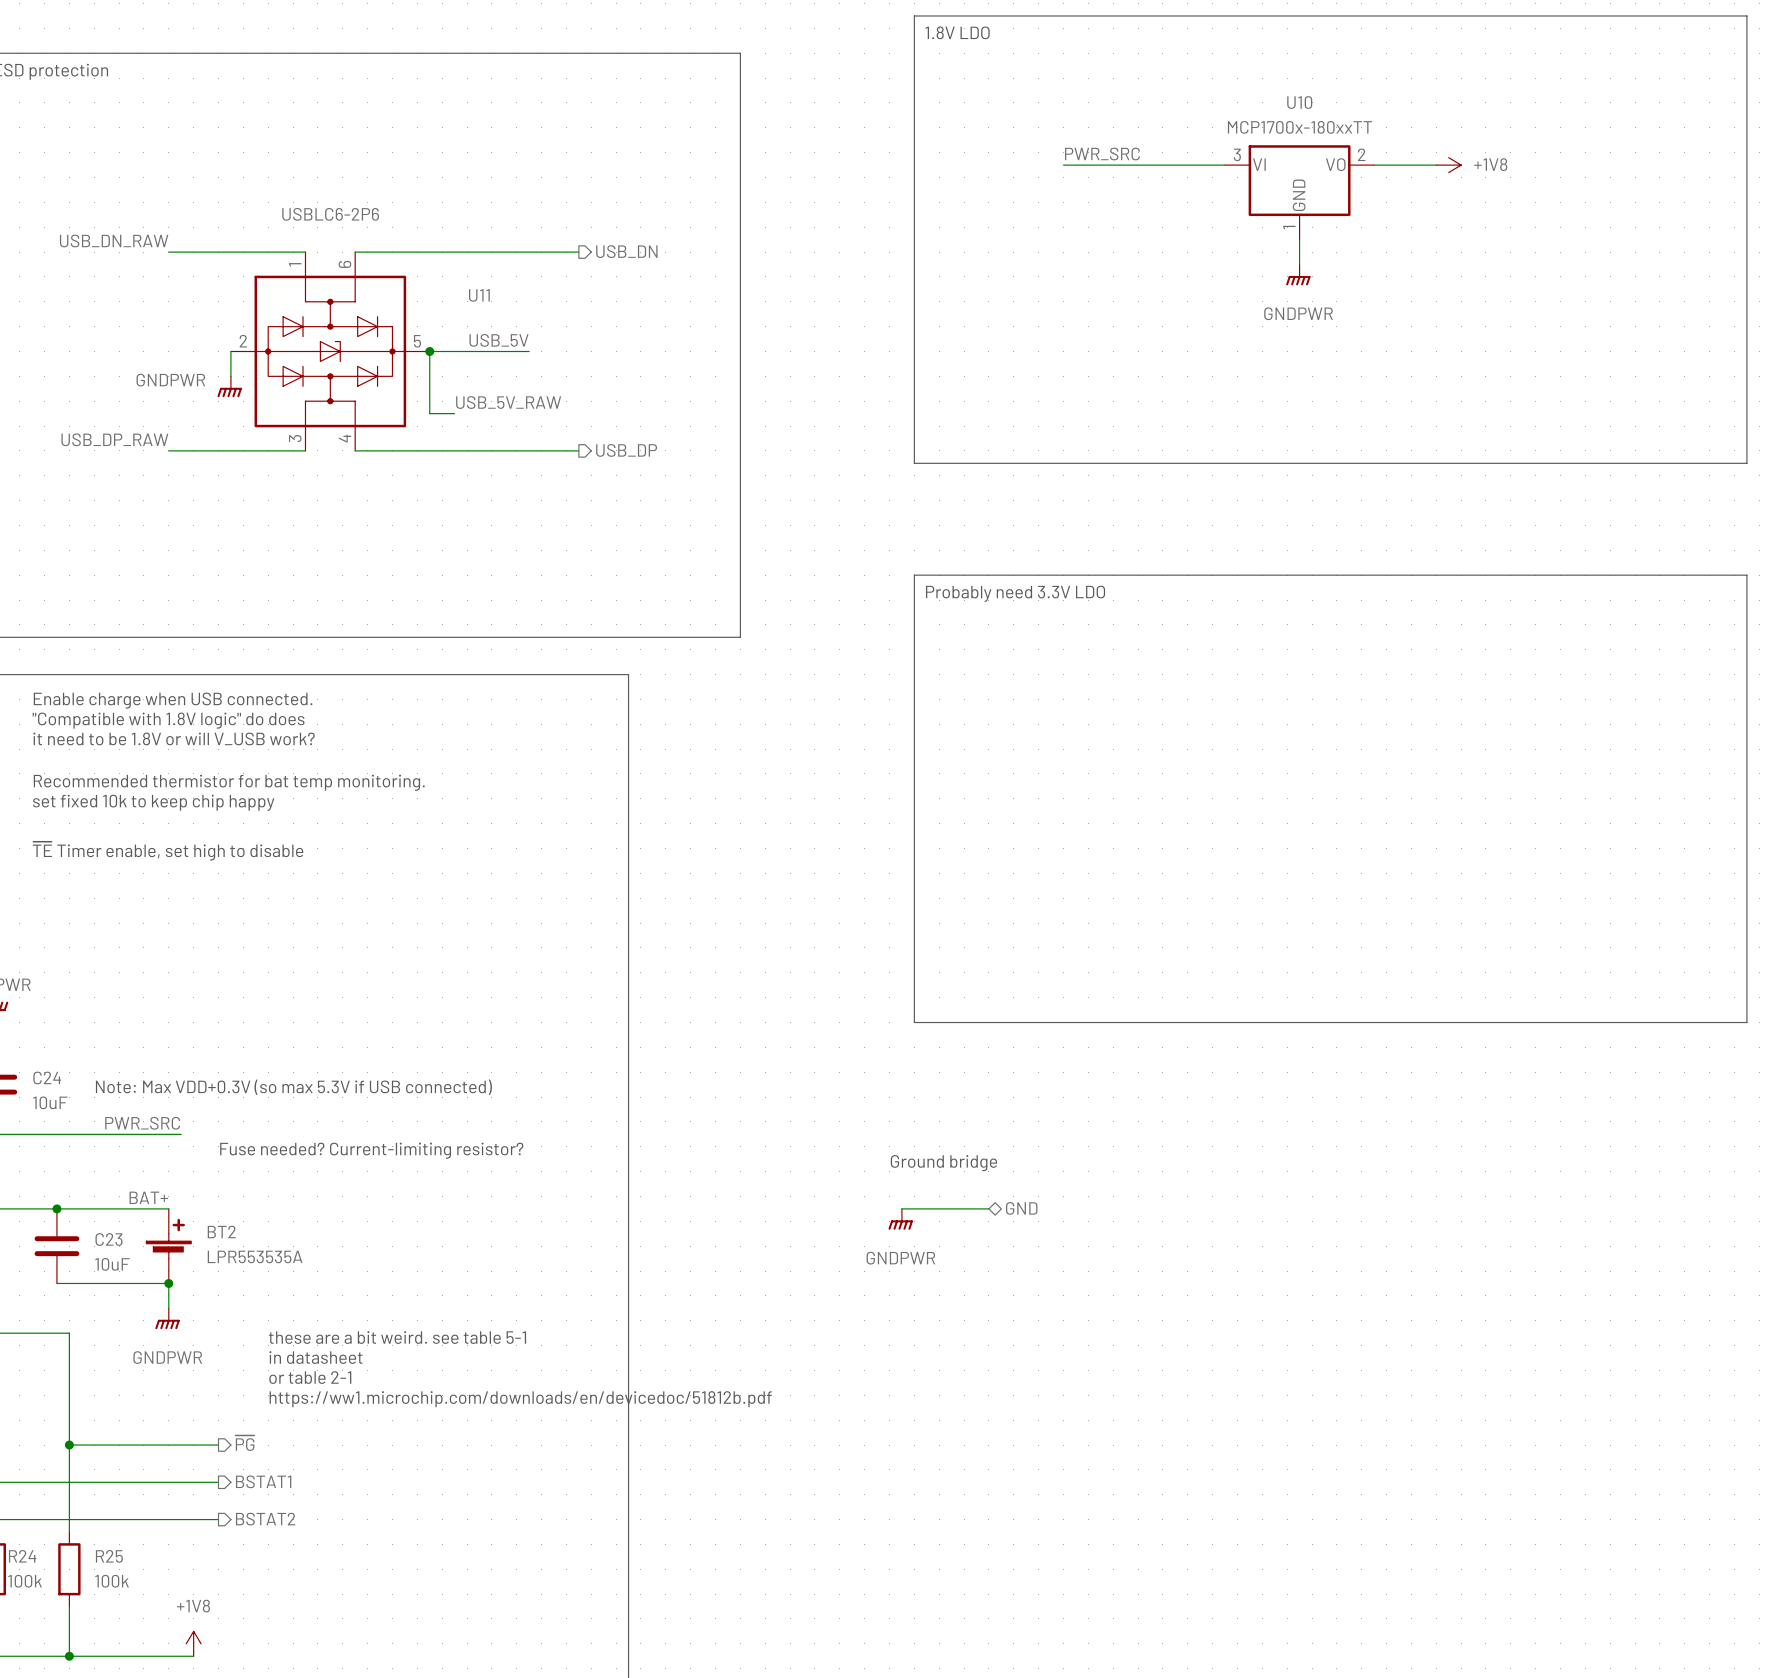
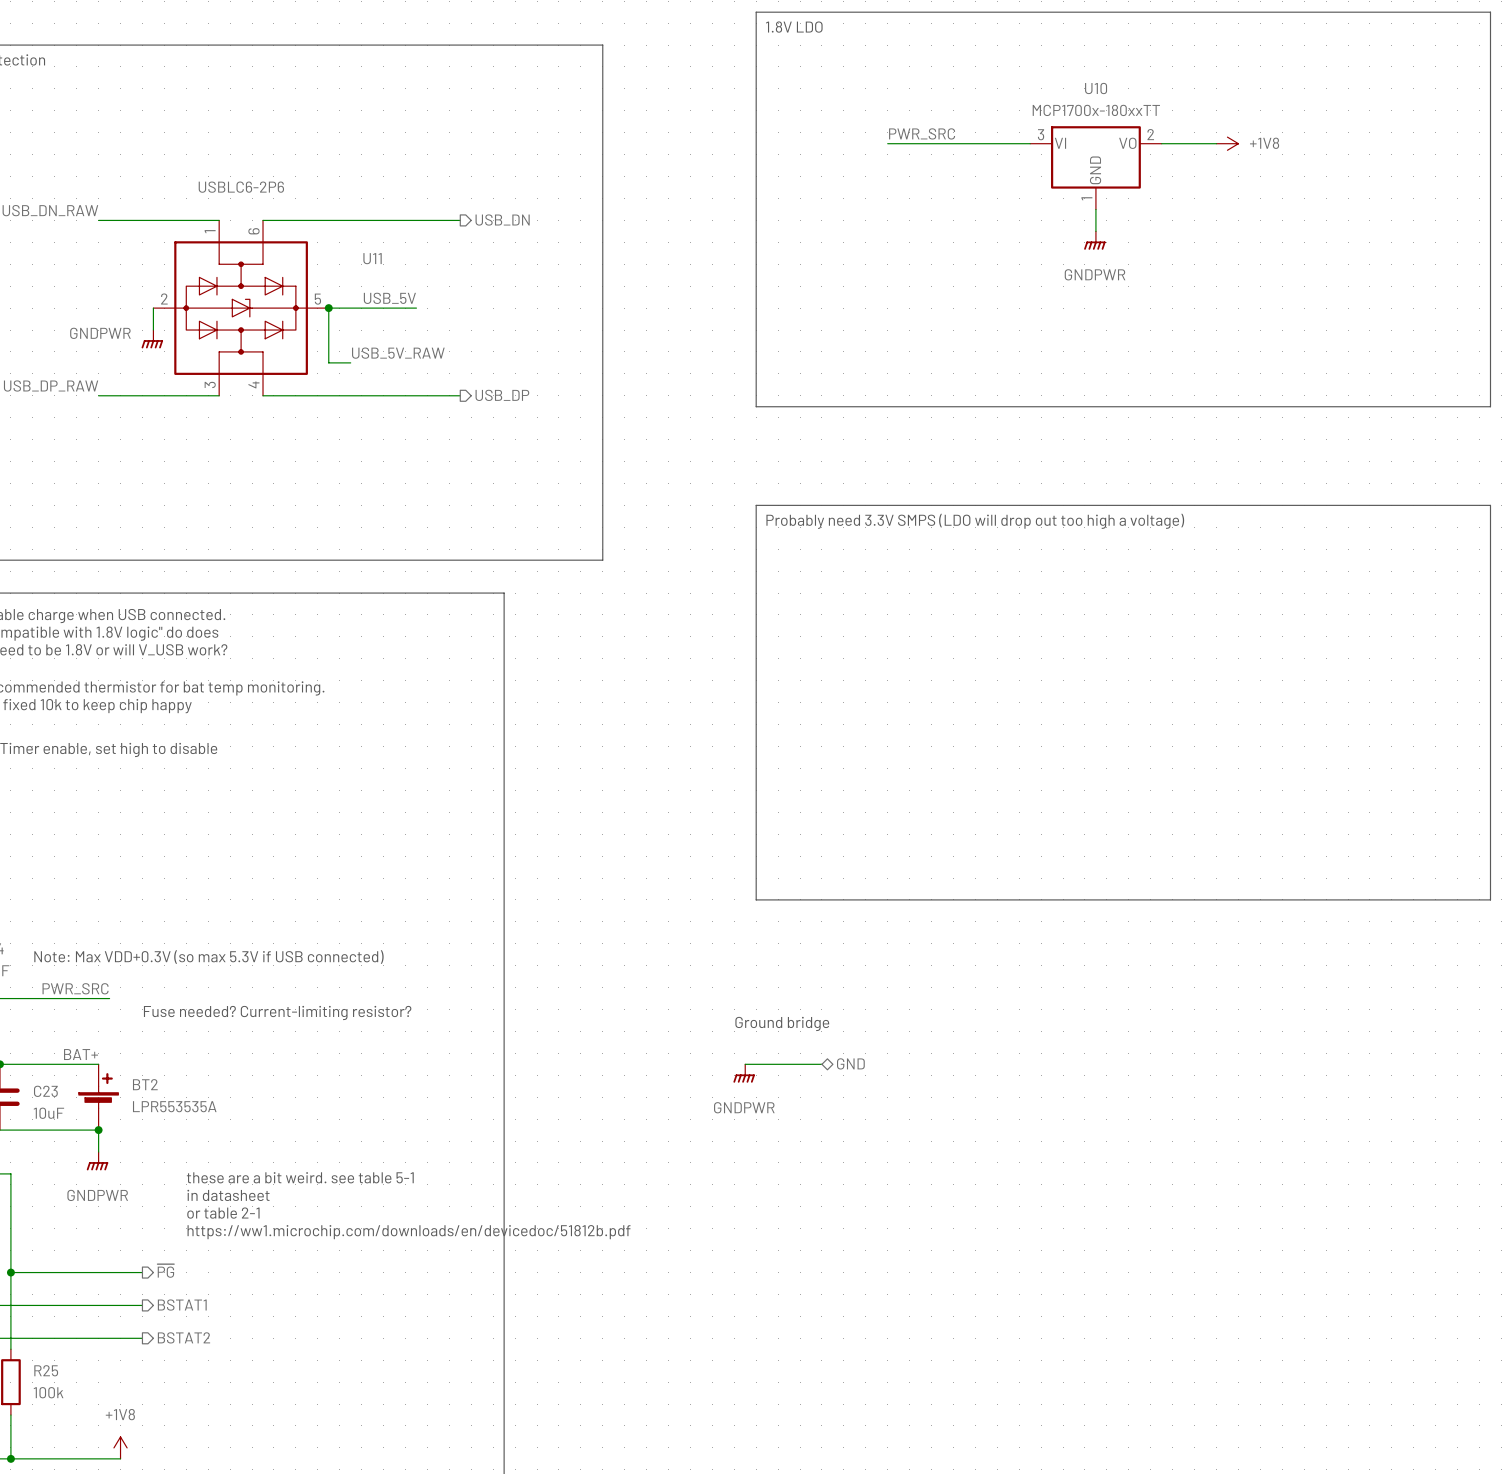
text: Probably need 3.3V LDO (1015, 593) -> Probably need 3.3V SMPS (LDO will drop out too high a voltage) (975, 521)

